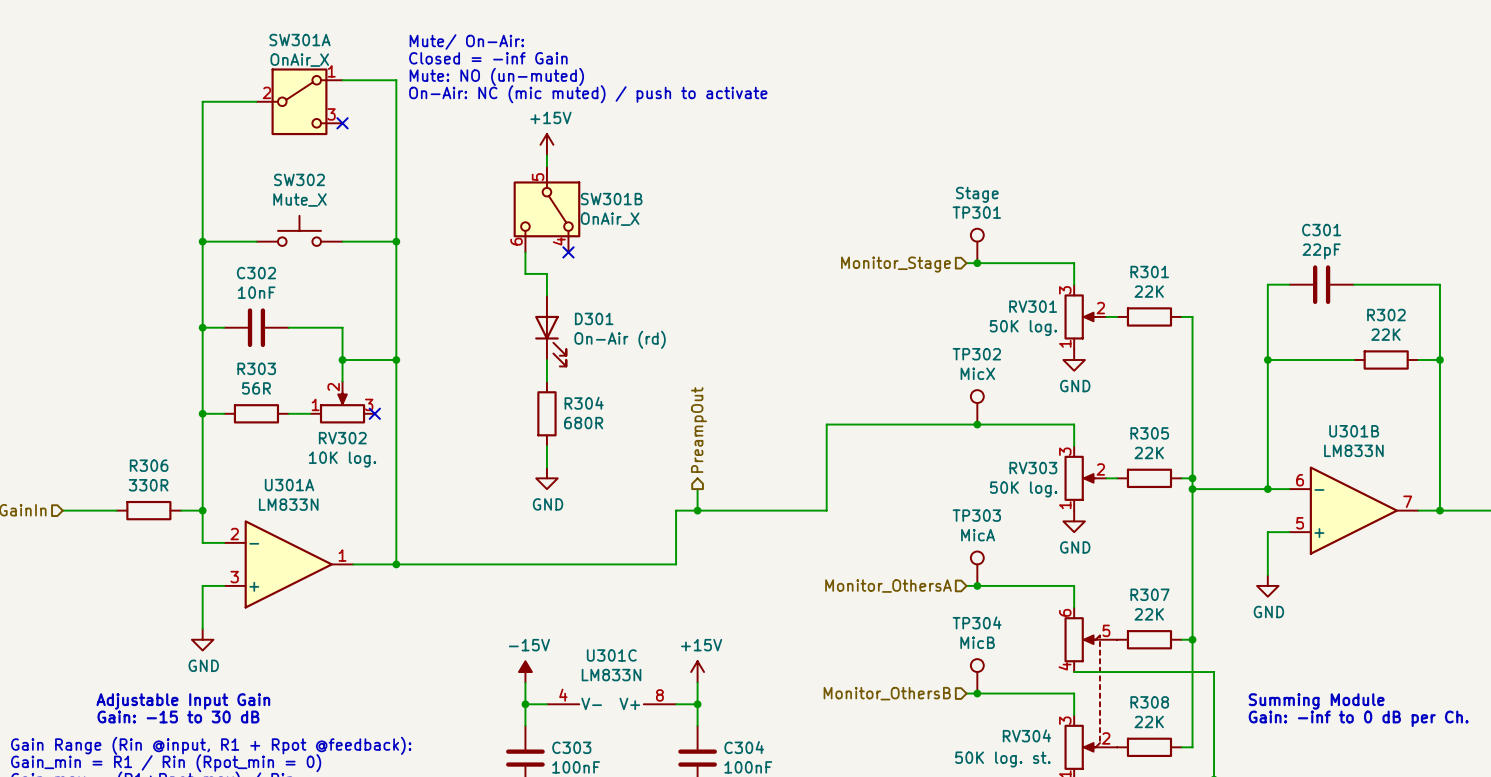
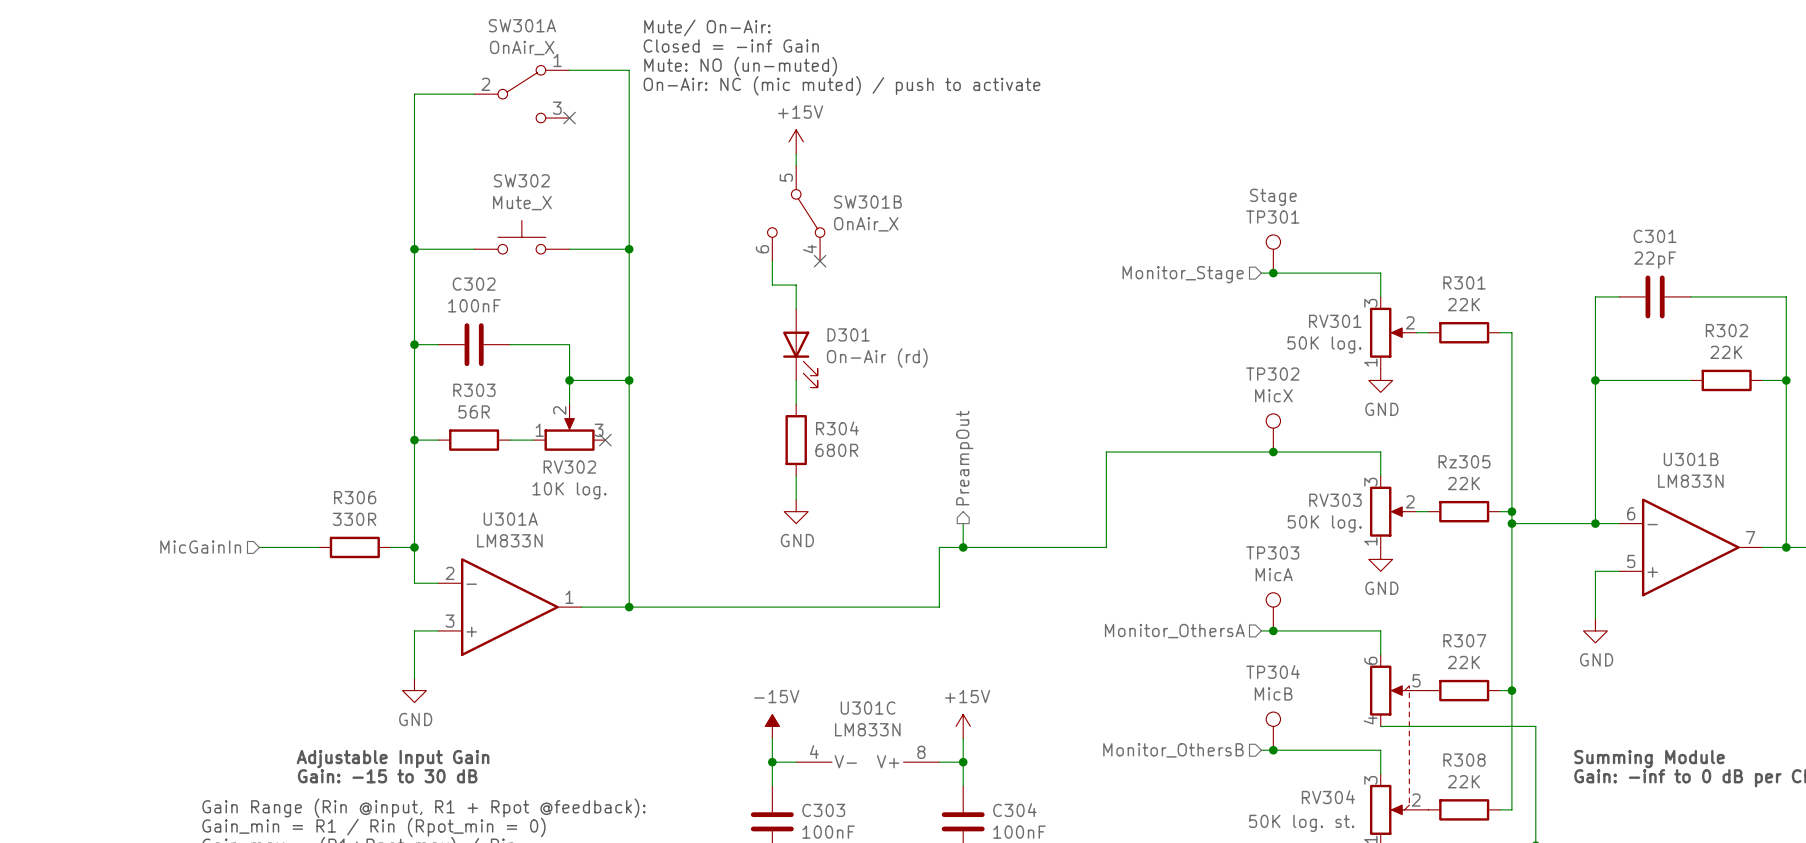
SW301A symbol: [256, 68, 343, 136] -> [474, 65, 570, 123]
SW301B symbol: [513, 166, 581, 253] -> [767, 165, 825, 262]
C302 value: 10nF (256, 292) -> 100nF (474, 305)
R305 name: R305 (1149, 433) -> Rz305 (1464, 461)

